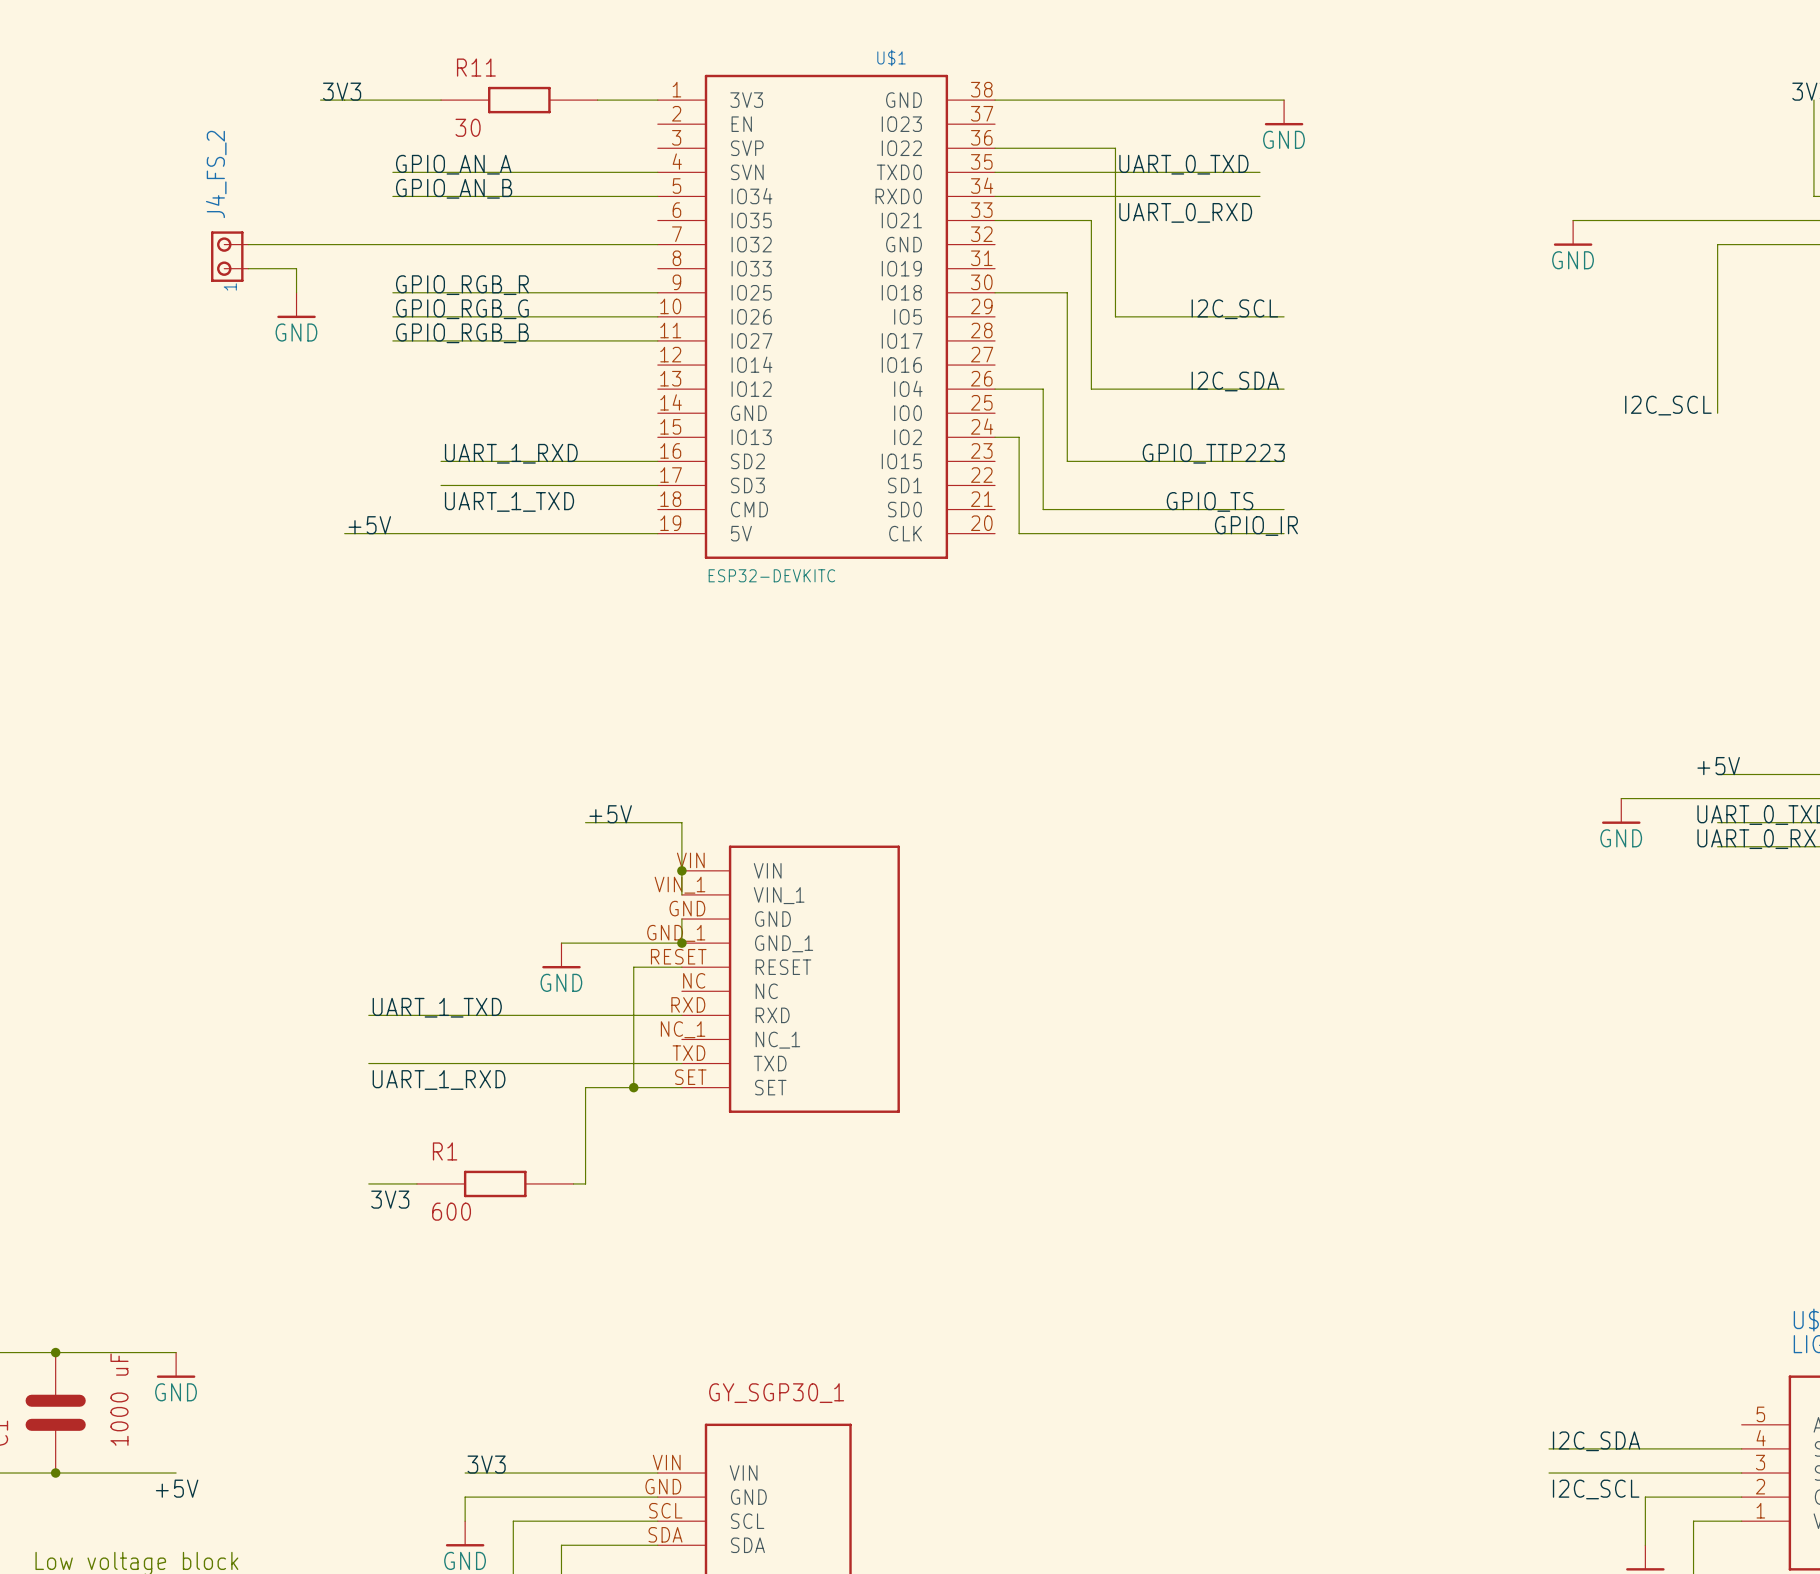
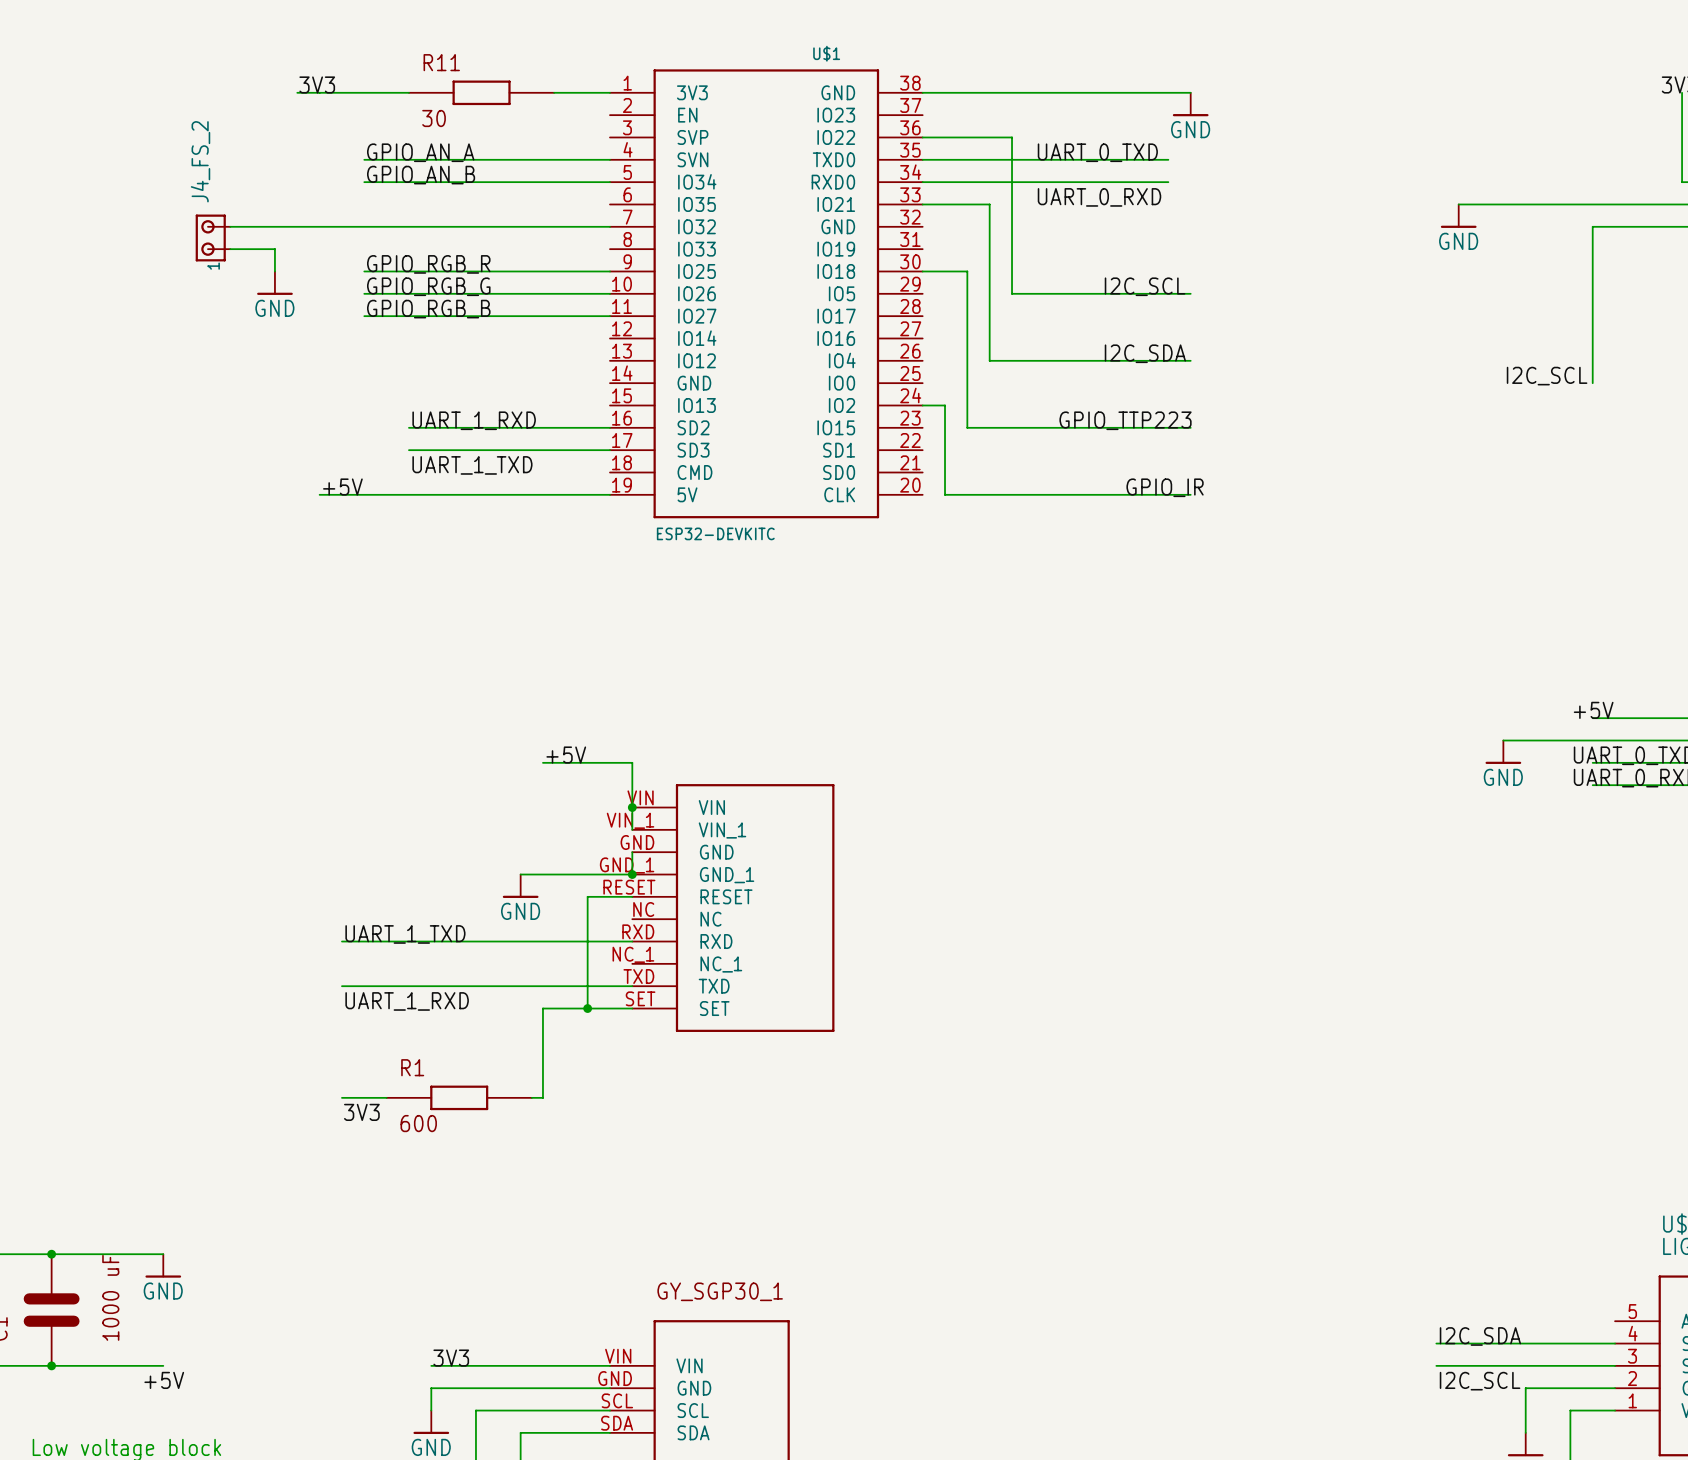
wire: (1091, 148) (1115, 148) (1115, 316) -> none
wire: (1067, 220) (1091, 220) -> (1012, 137) (1012, 204)
wire: (1043, 292) (1067, 292) -> (989, 204) (989, 271)
wire: (1091, 316) (1091, 389) -> (1012, 293) (1034, 293)
wire: (995, 389) (1043, 389) -> (967, 271) (967, 360)
wire: (1067, 389) (1067, 461) -> (989, 360) (1012, 360)
wire: (1043, 461) (1043, 509) (1284, 509) -> (967, 427) (989, 427)
label: GPIO_TS (1210, 501) -> none

